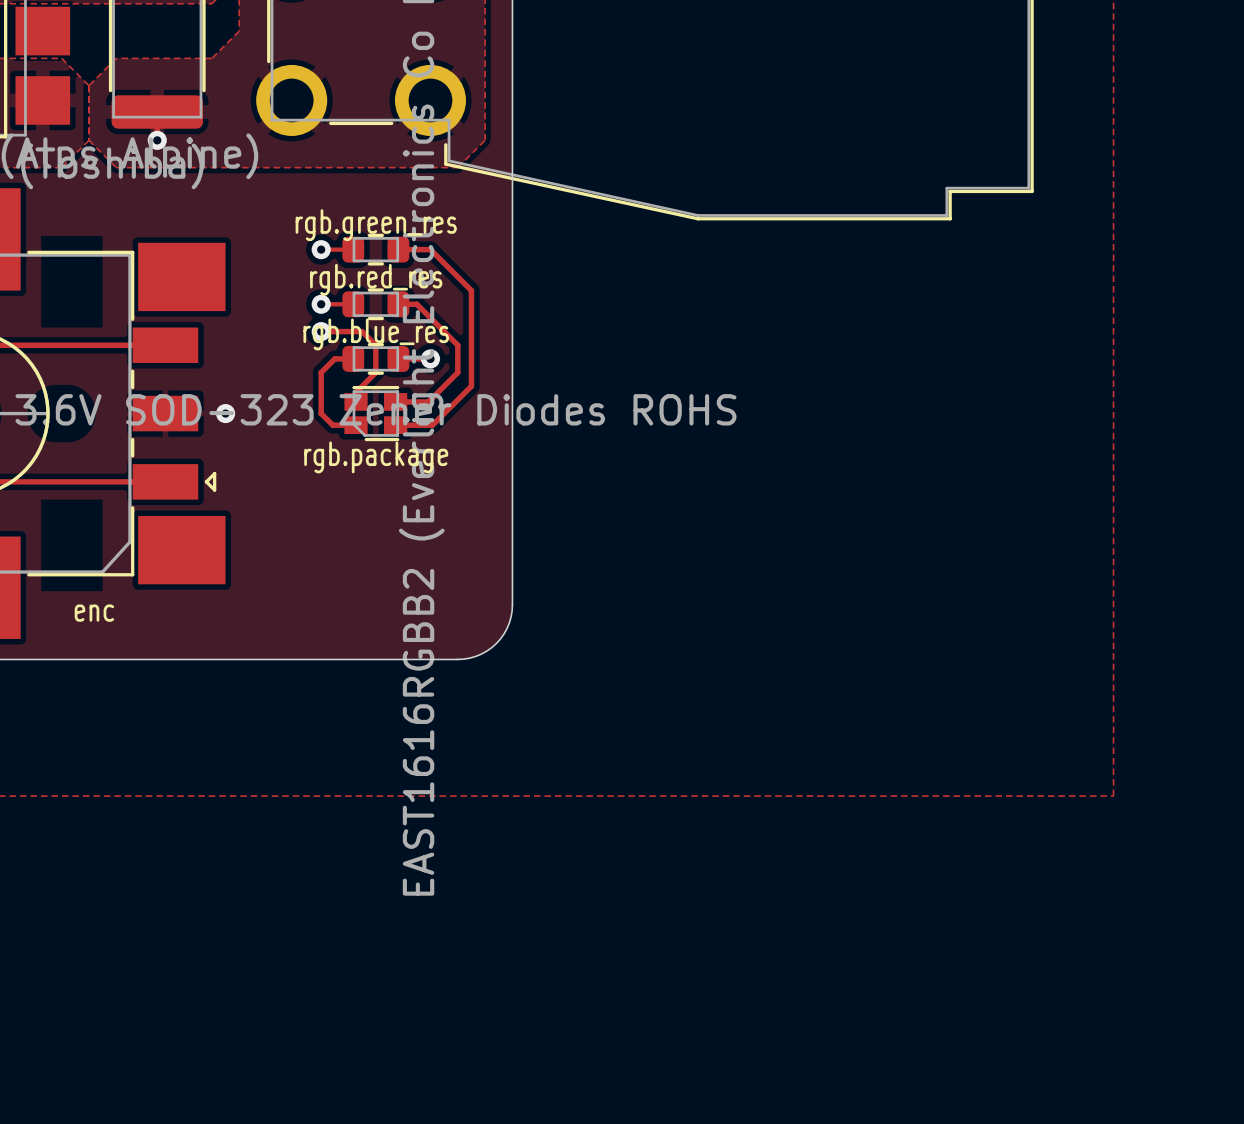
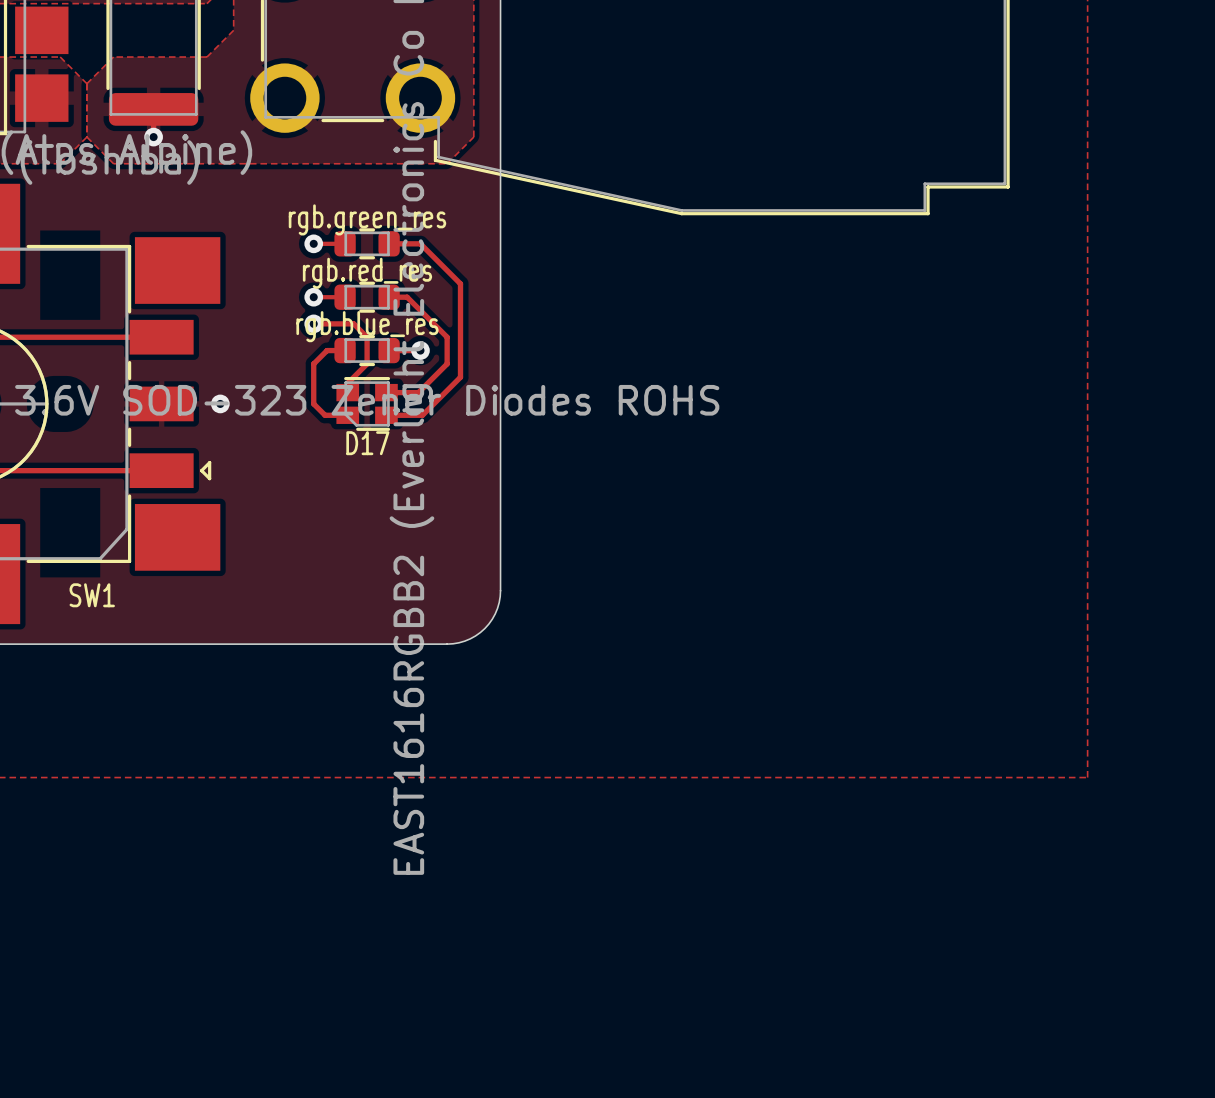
rgb.package name: rgb.package (376, 457) -> D17 (367, 443)
enc name: enc (94, 613) -> SW1 (92, 595)

